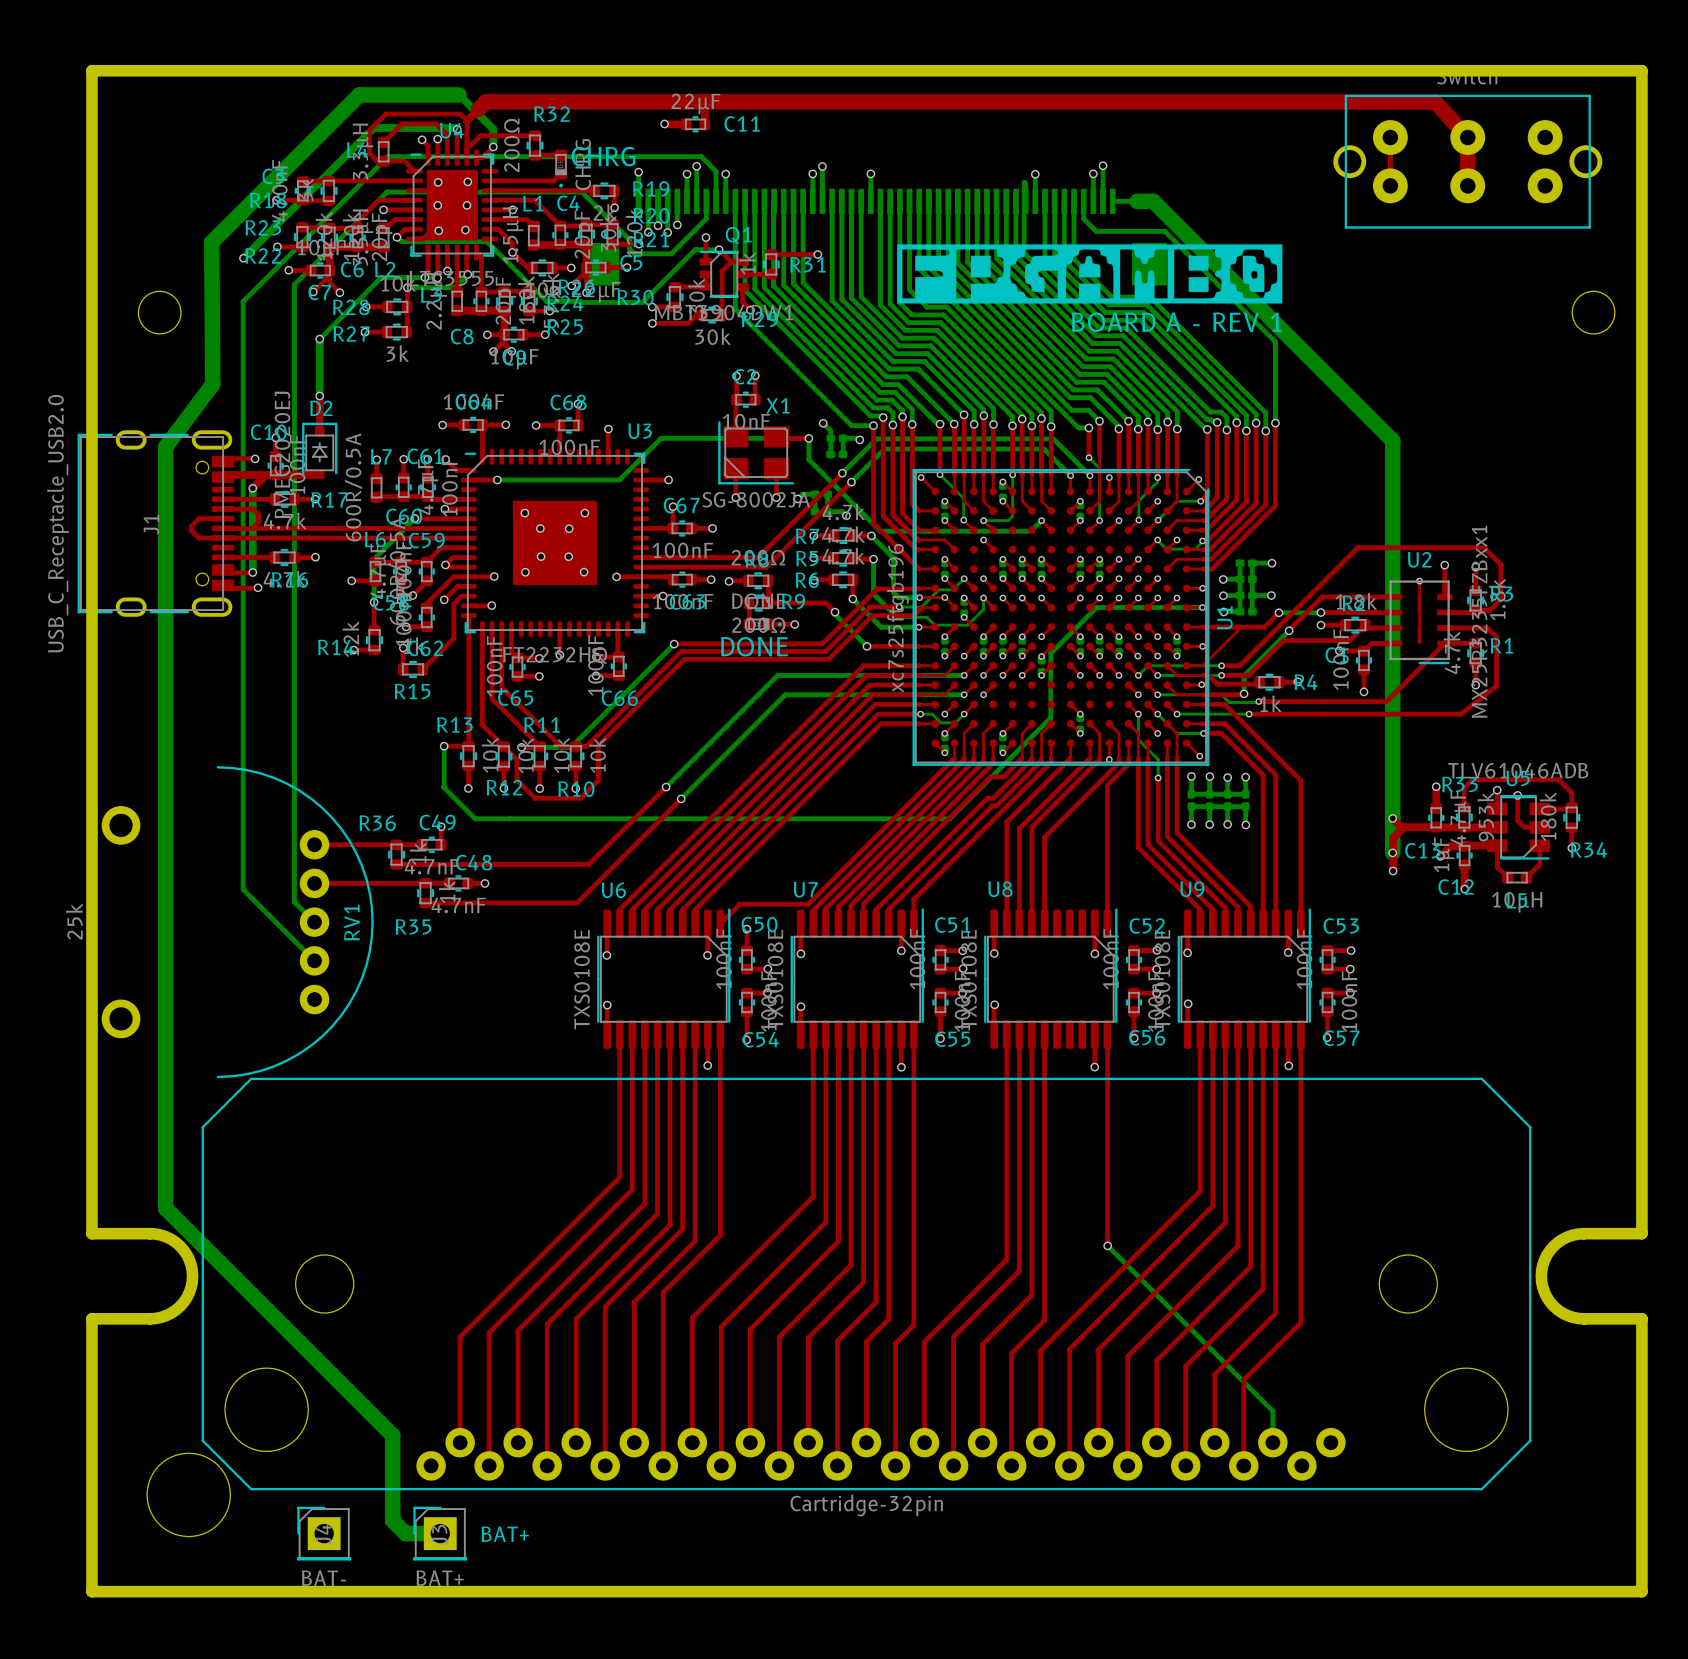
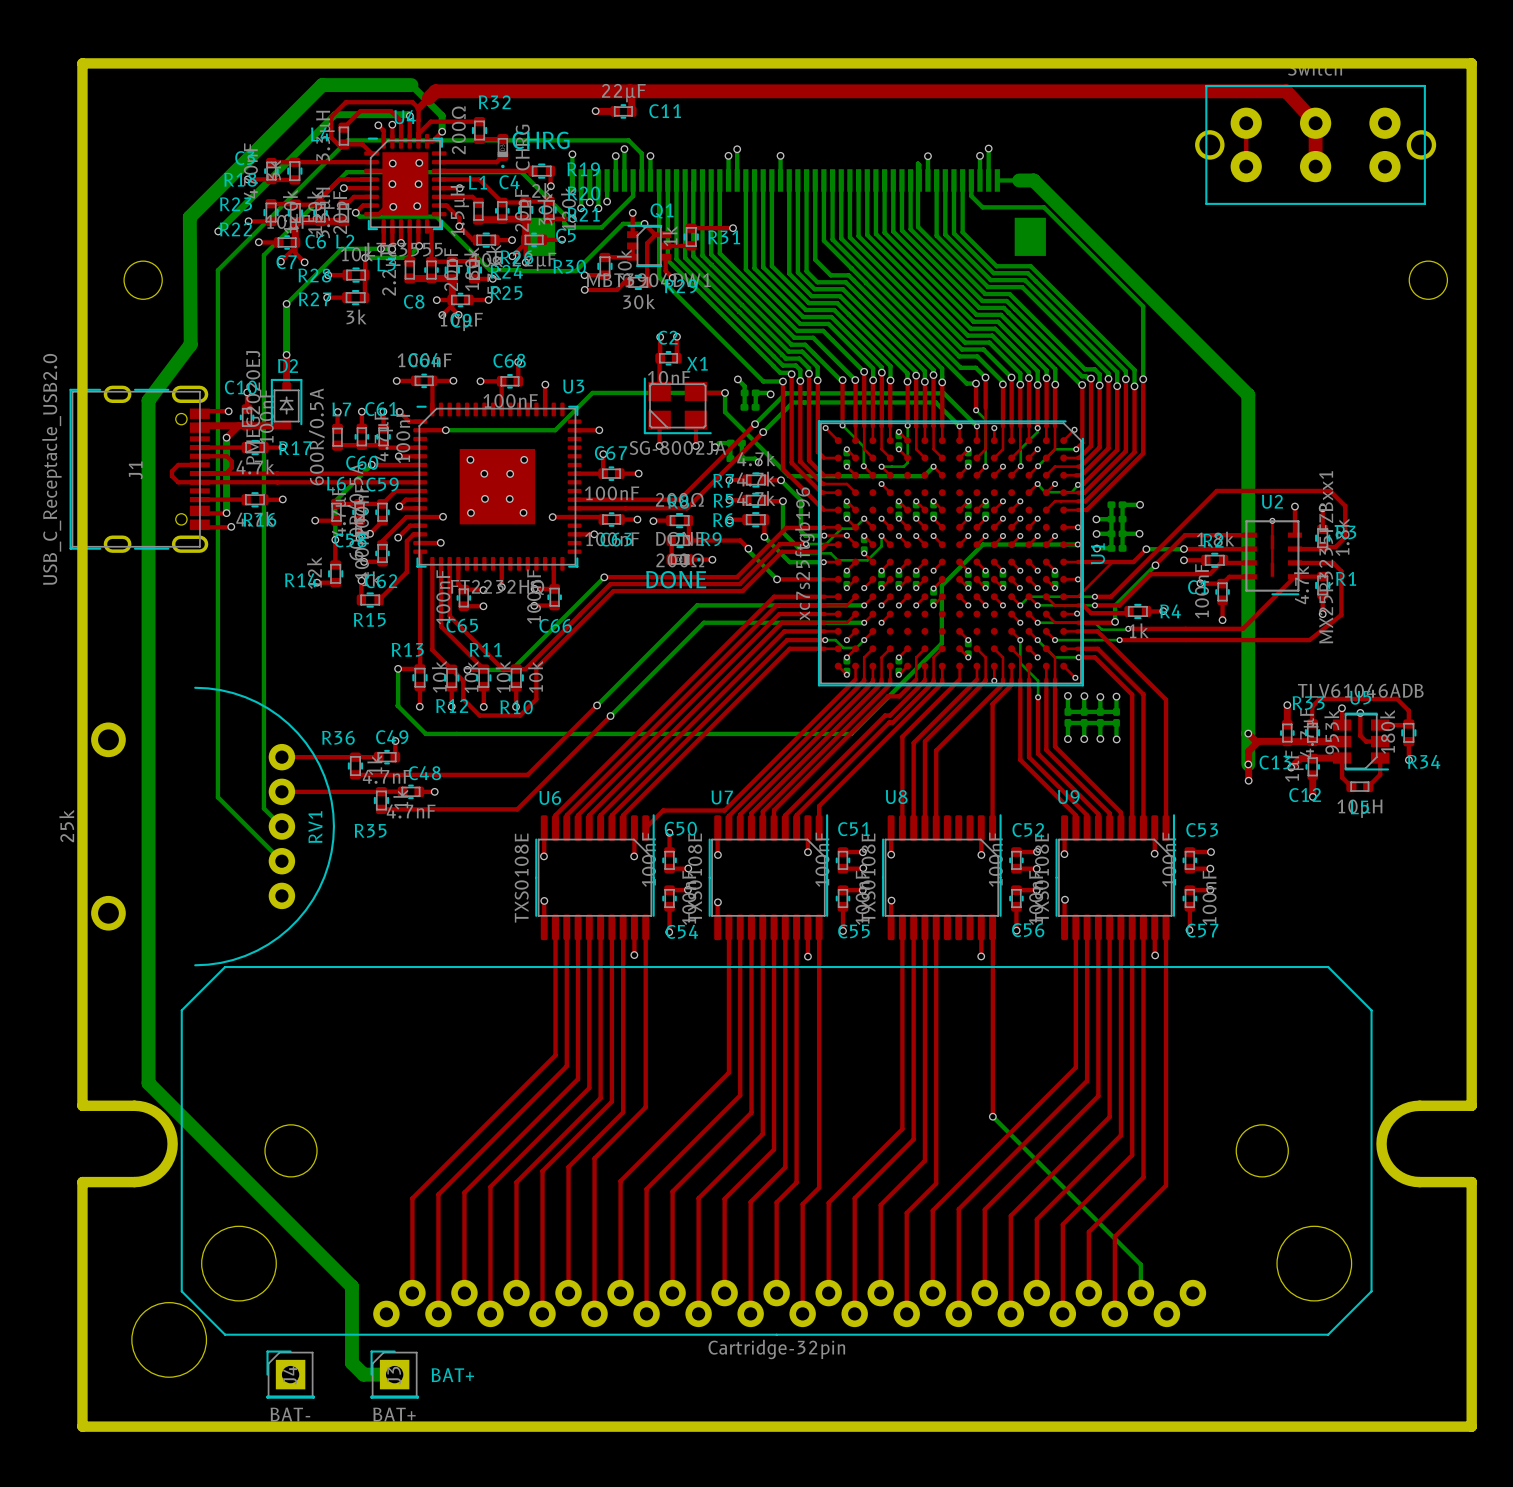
drawing: [897, 244, 1283, 304] -> none
text: BOARD A - REV 1 (1176, 322) -> none

